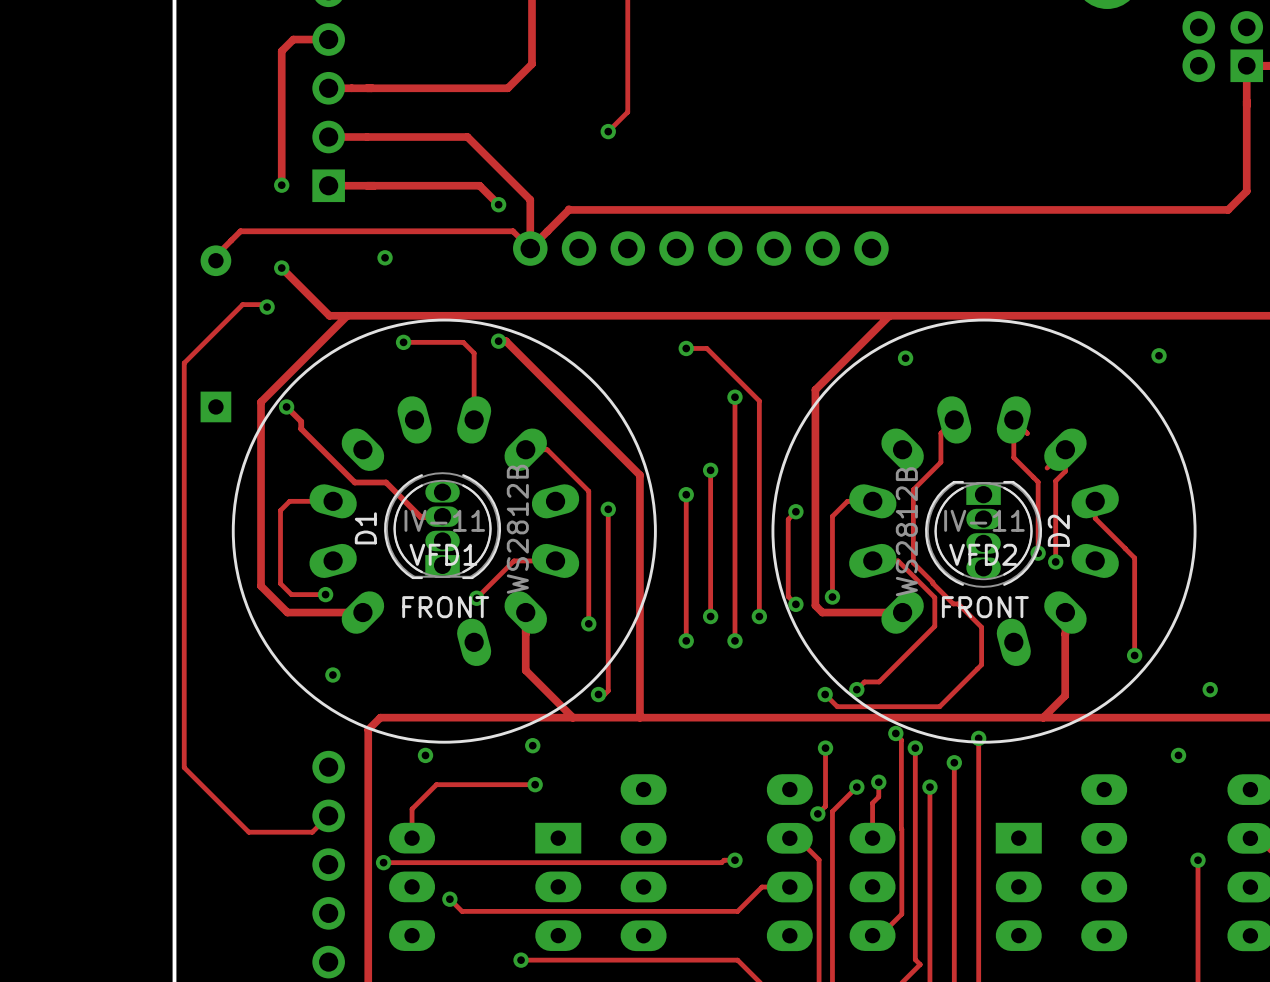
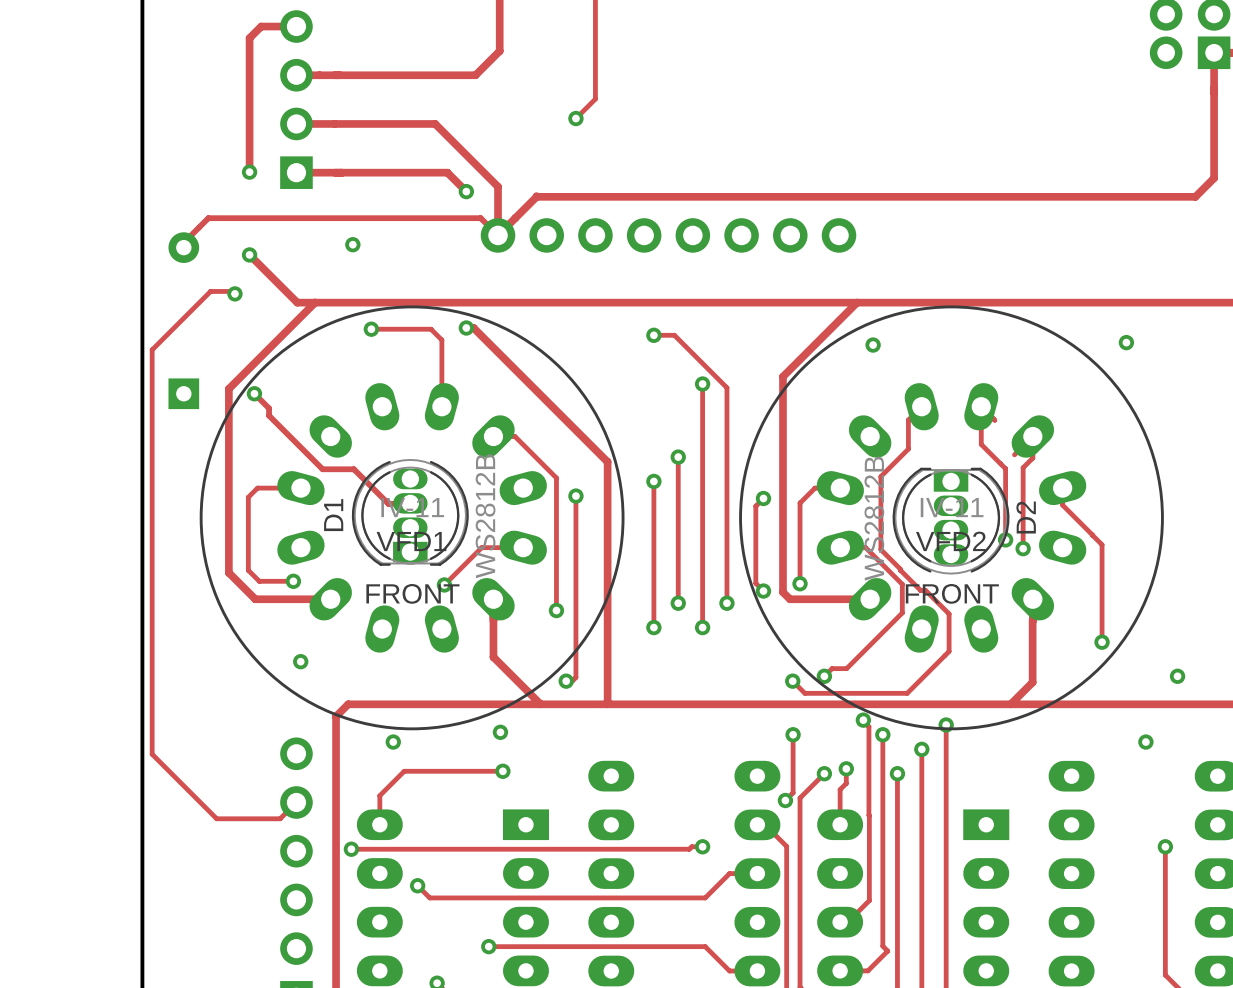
VFD1 footprint: [231, 318, 657, 744] -> [199, 305, 625, 731]
VFD2 footprint: [771, 318, 1197, 744] -> [739, 305, 1164, 731]

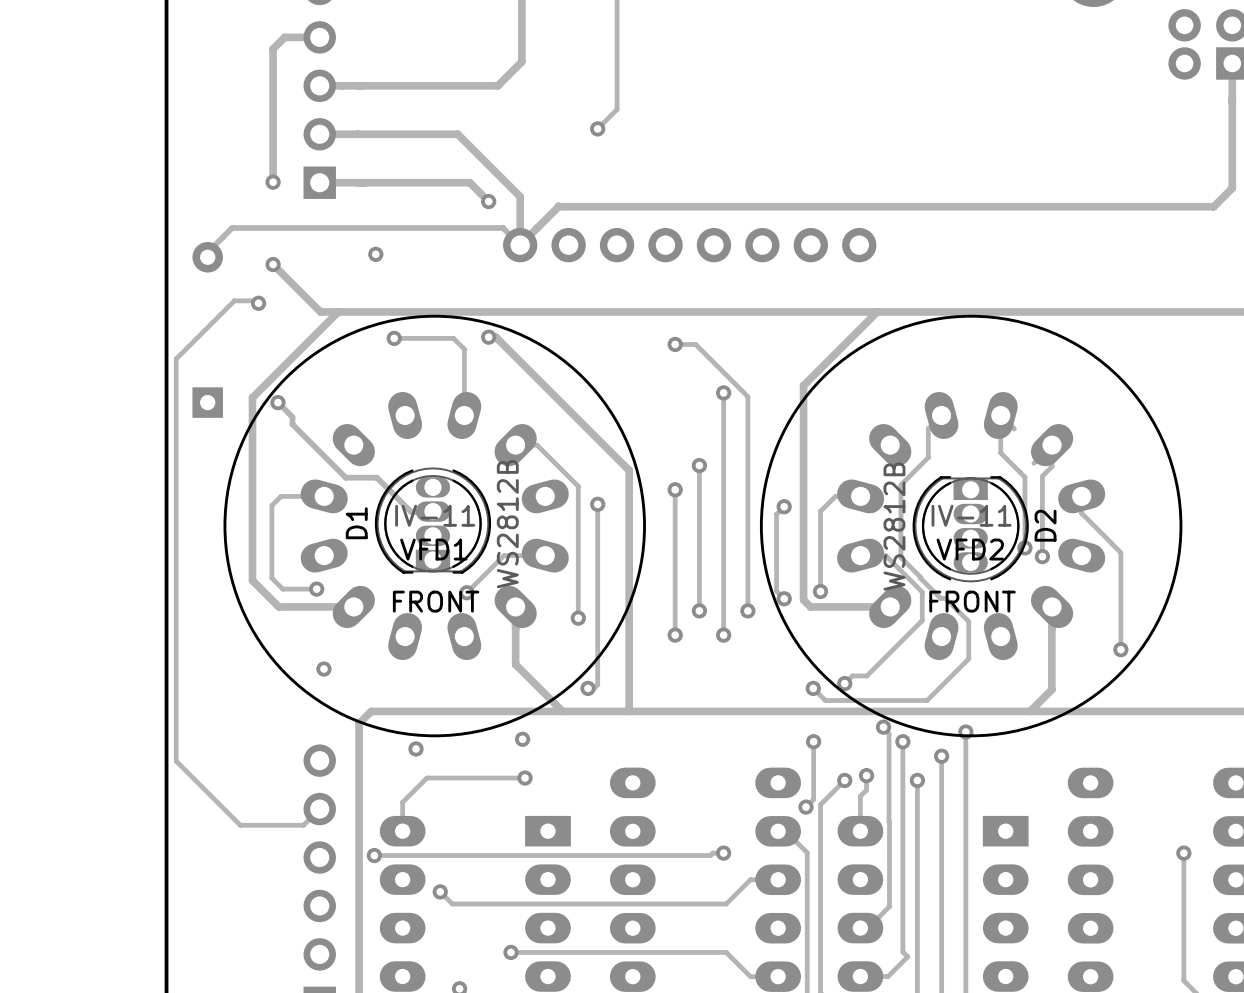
via: (1126, 342) -> none
via: (873, 345) -> none
via: (1177, 676) -> none
via: (1145, 742) -> none

